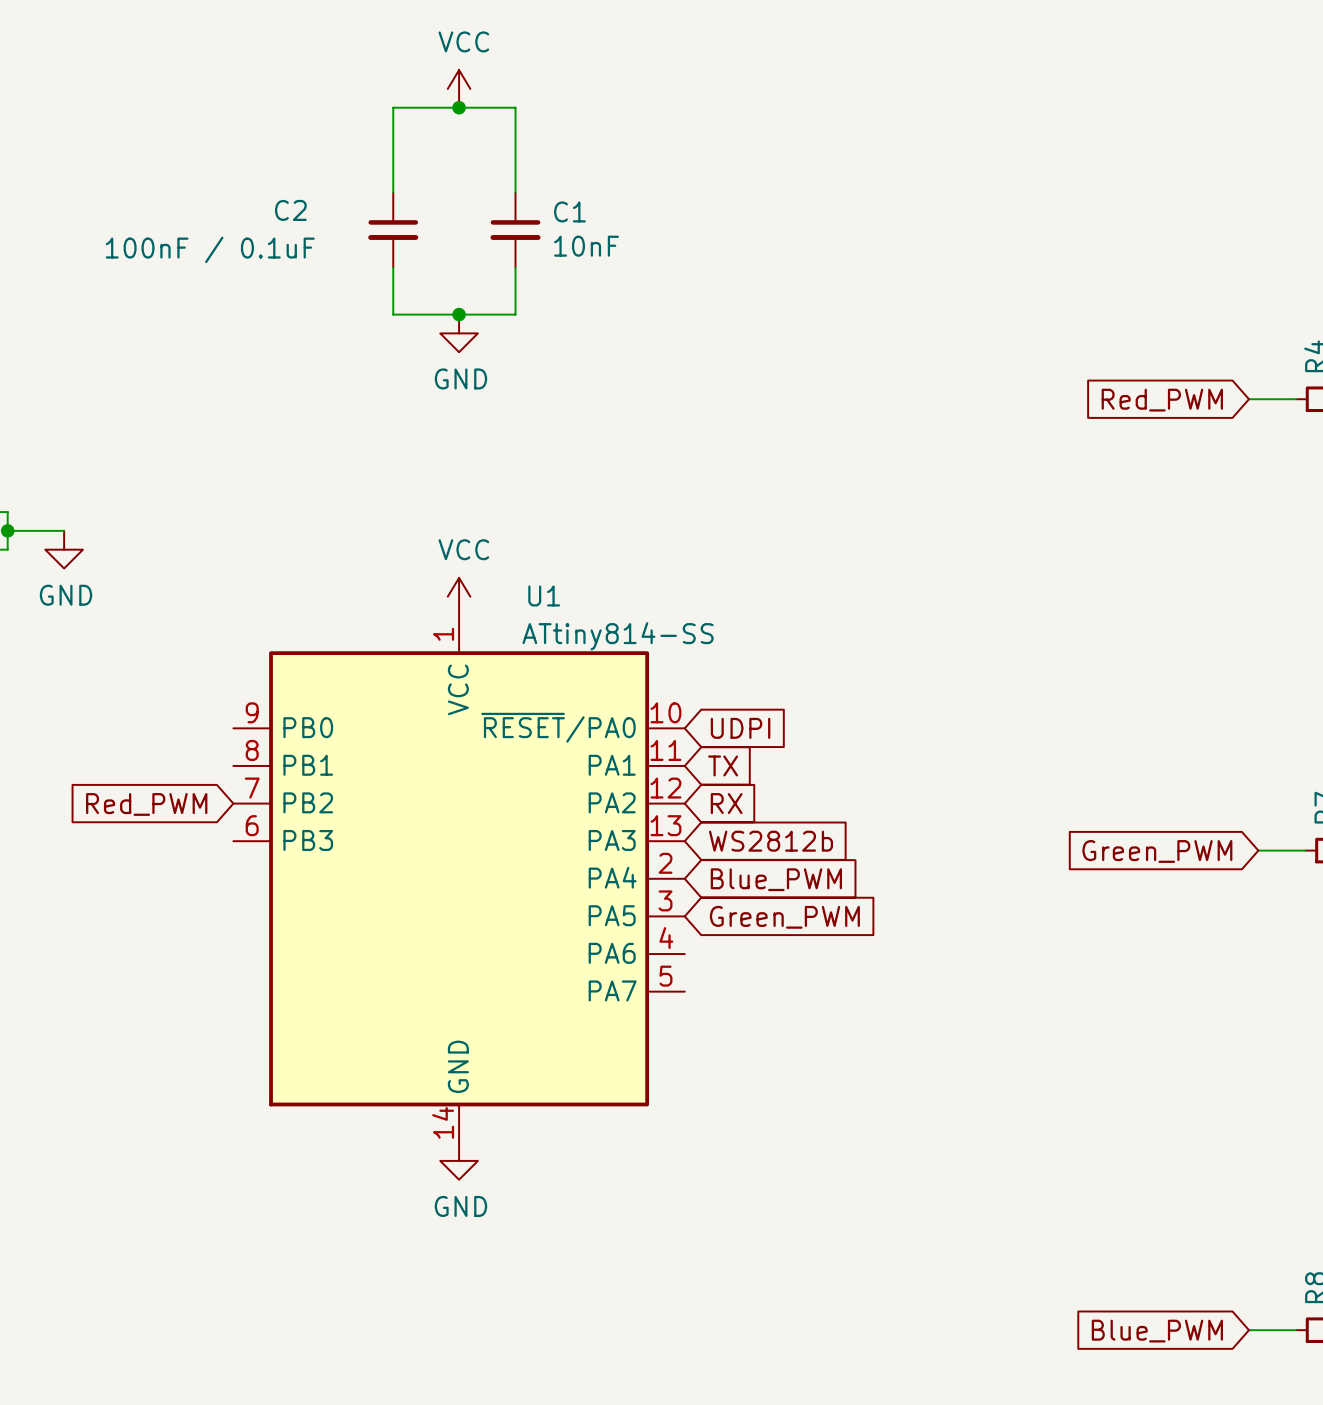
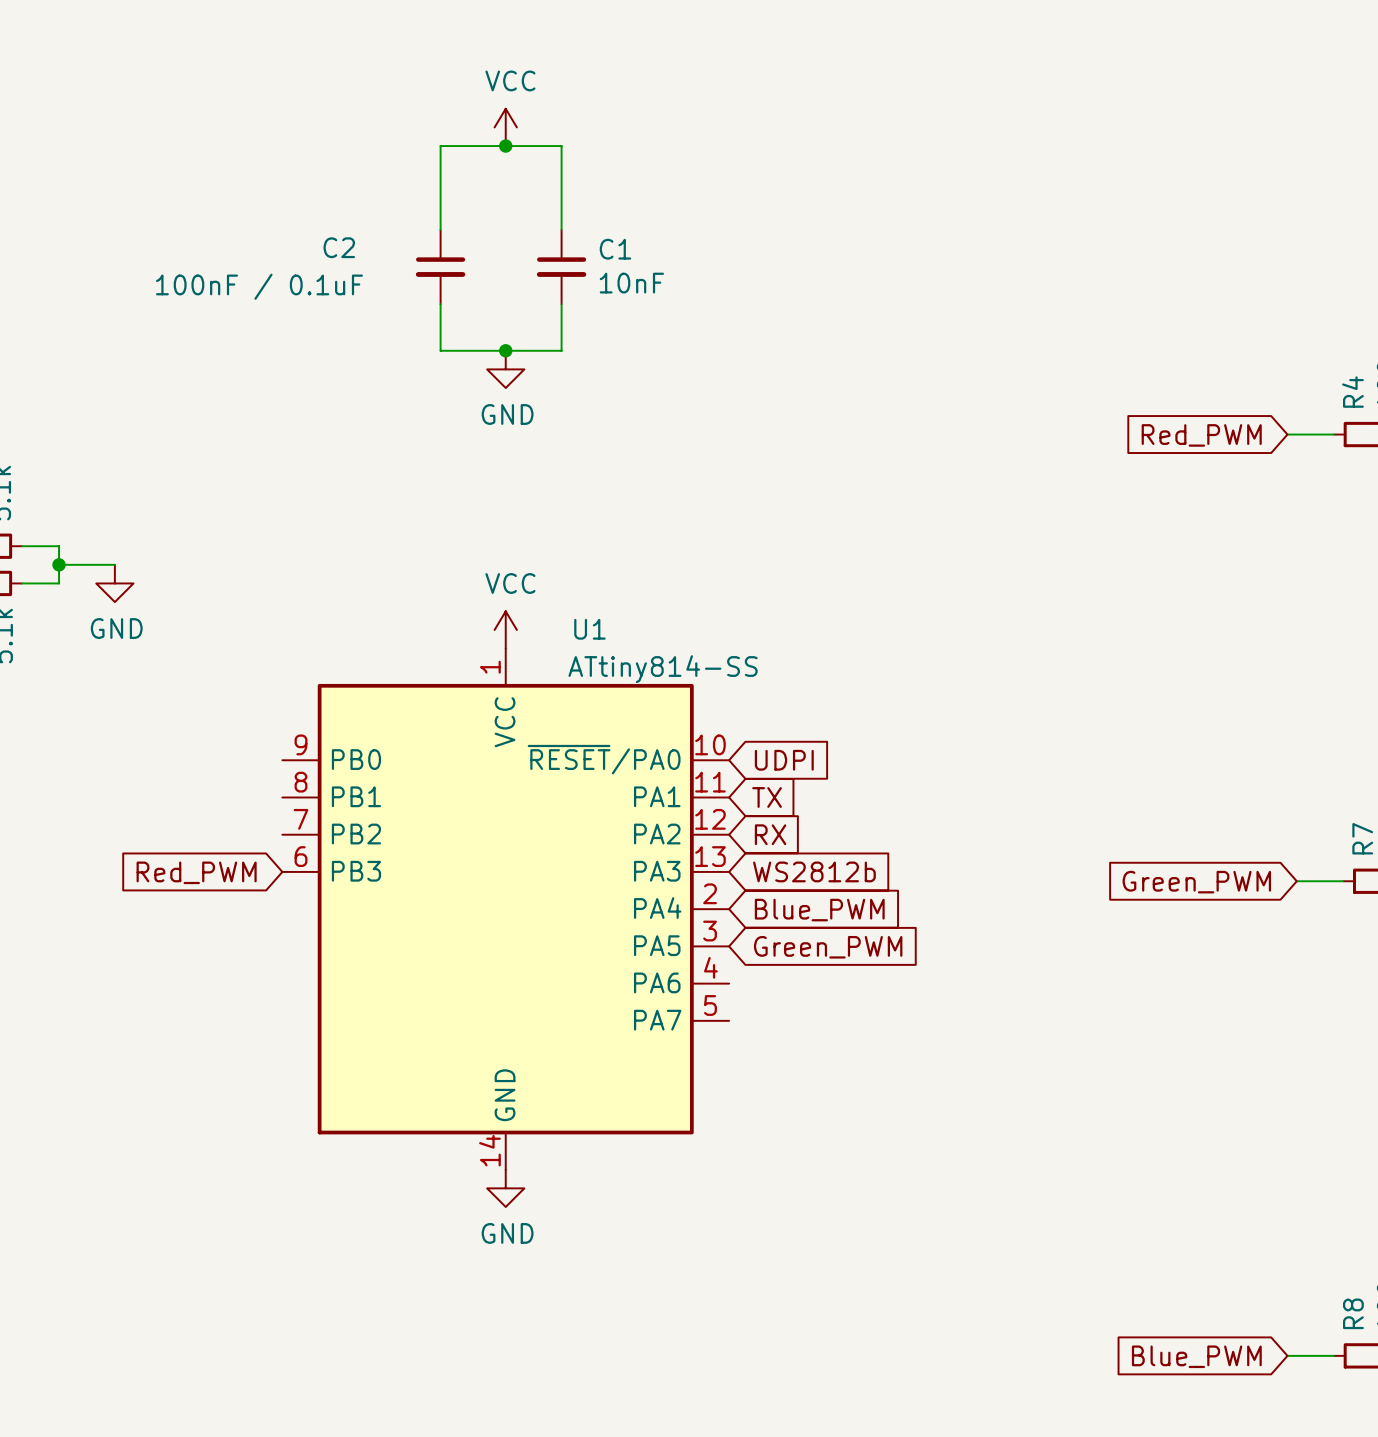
global label position: Red_PWM (146, 804) -> Red_PWM (196, 872)

